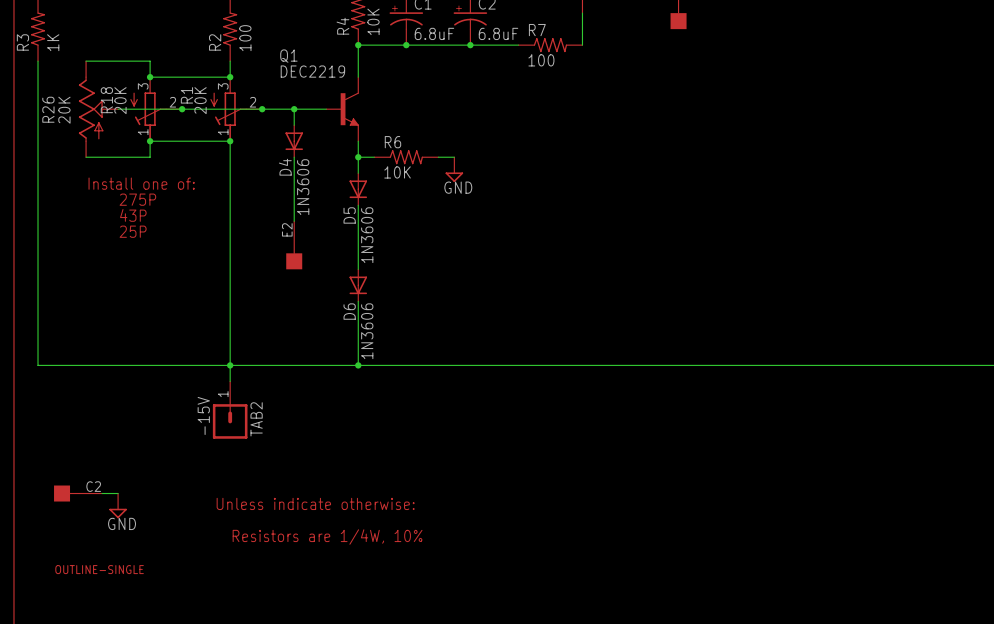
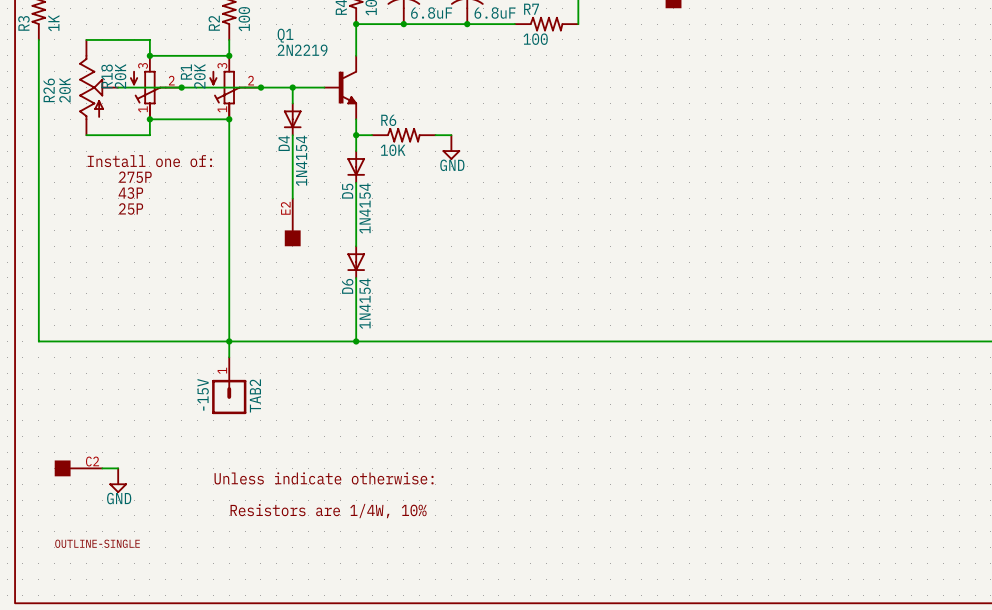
Q1 value: DEC2219 (312, 71) -> 2N2219 (302, 50)
D4 value: 1N3606 (303, 187) -> 1N4154 (301, 160)
D5 value: 1N3606 (367, 235) -> 1N4154 (365, 208)
D6 value: 1N3606 (367, 331) -> 1N4154 (365, 303)

